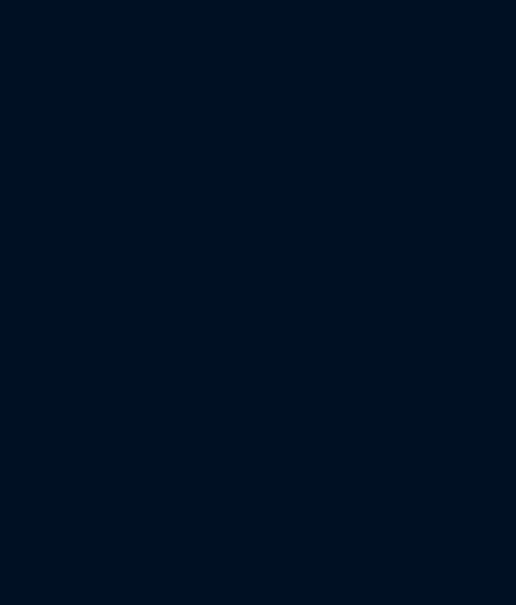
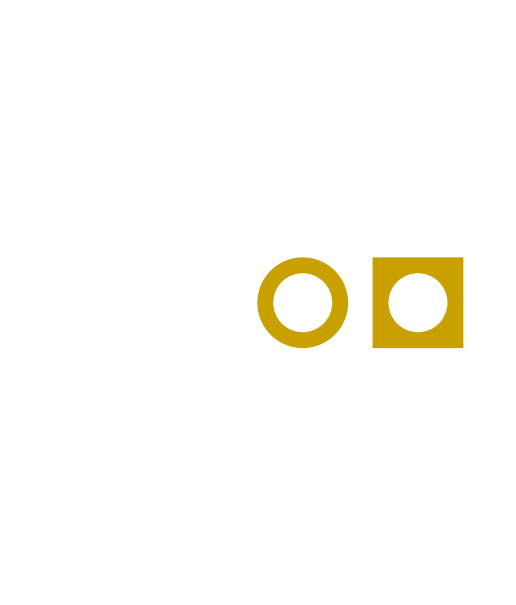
part: none -> (360, 302)

